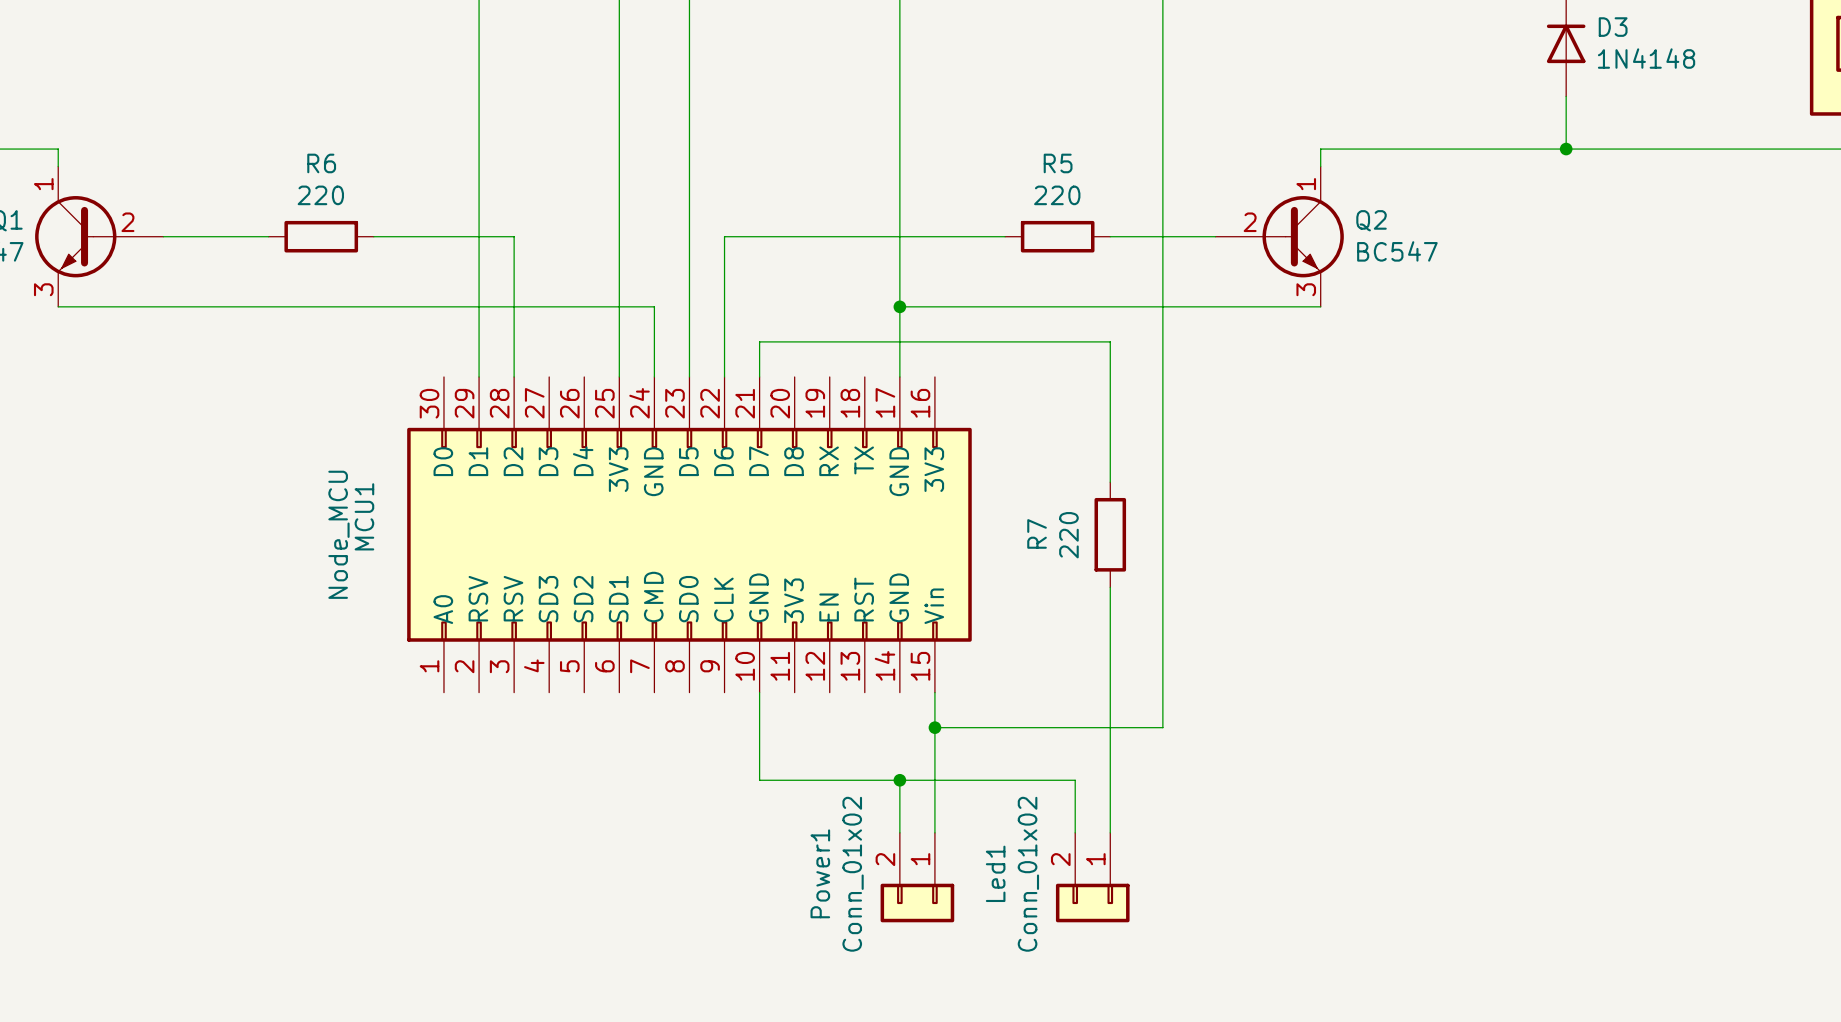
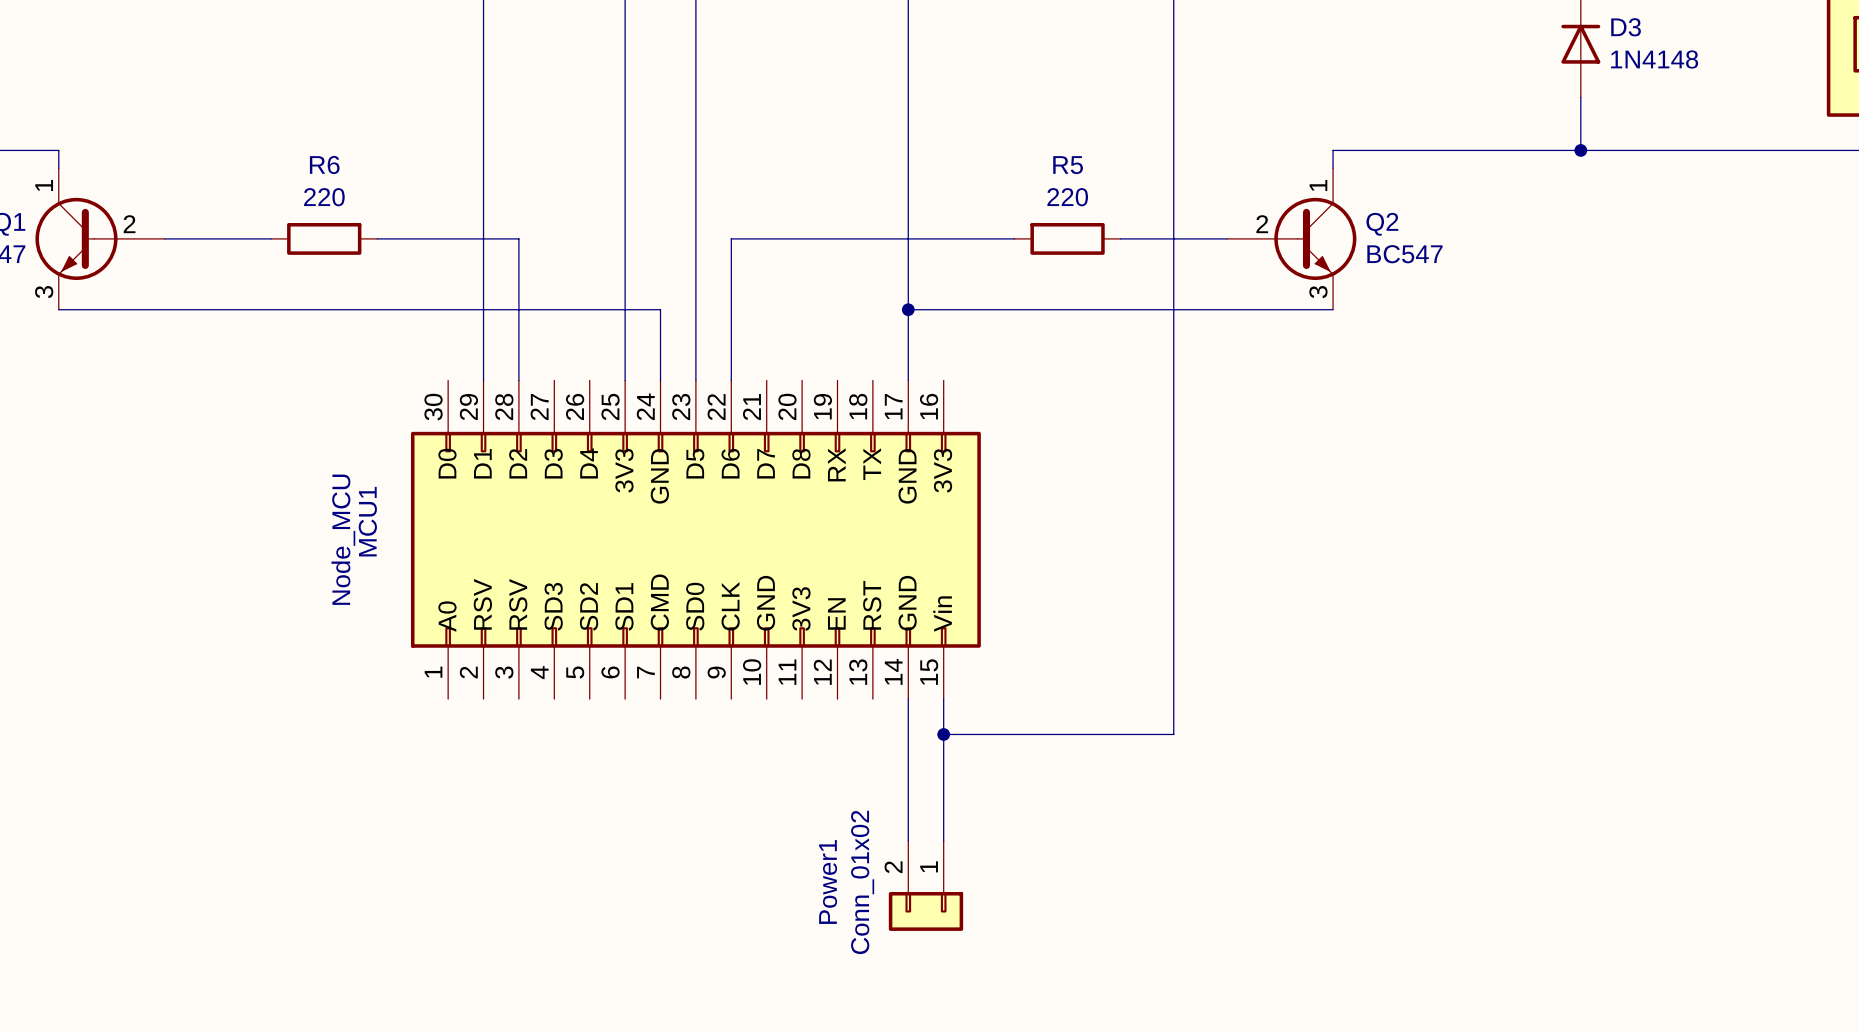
wire: (759, 376) (759, 341) (1110, 341) (1110, 482) -> none
R7: 220 (1110, 534) -> none
wire: (1110, 587) (1110, 832) -> none
wire: (759, 692) (759, 780) (1075, 780) (1075, 832) -> none
wire: none -> (908, 699) (908, 787)
junction: (899, 780) -> none
Led1: Conn_01x02 (1092, 877) -> none

